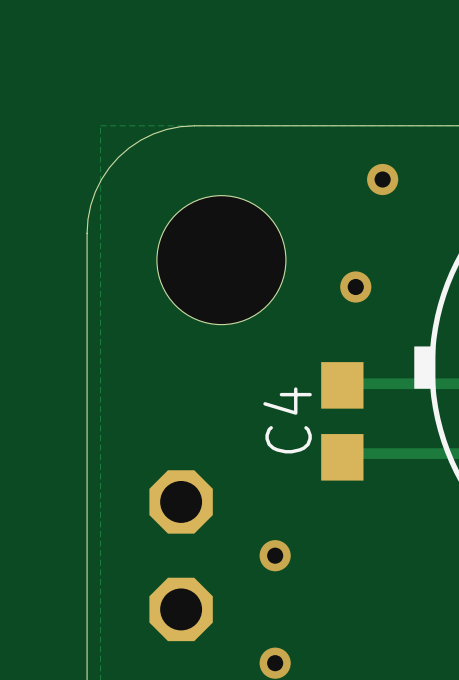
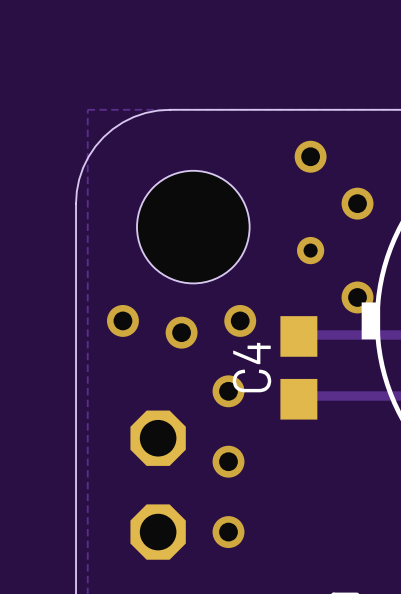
via position: (382, 179) -> (310, 156)
via: none -> (357, 203)
via: none -> (357, 297)
via: none -> (122, 320)
via: none -> (240, 320)
via: none -> (181, 332)
via: none -> (228, 391)
via position: (275, 555) -> (228, 461)
via: none -> (228, 532)
via: (275, 663) -> none

